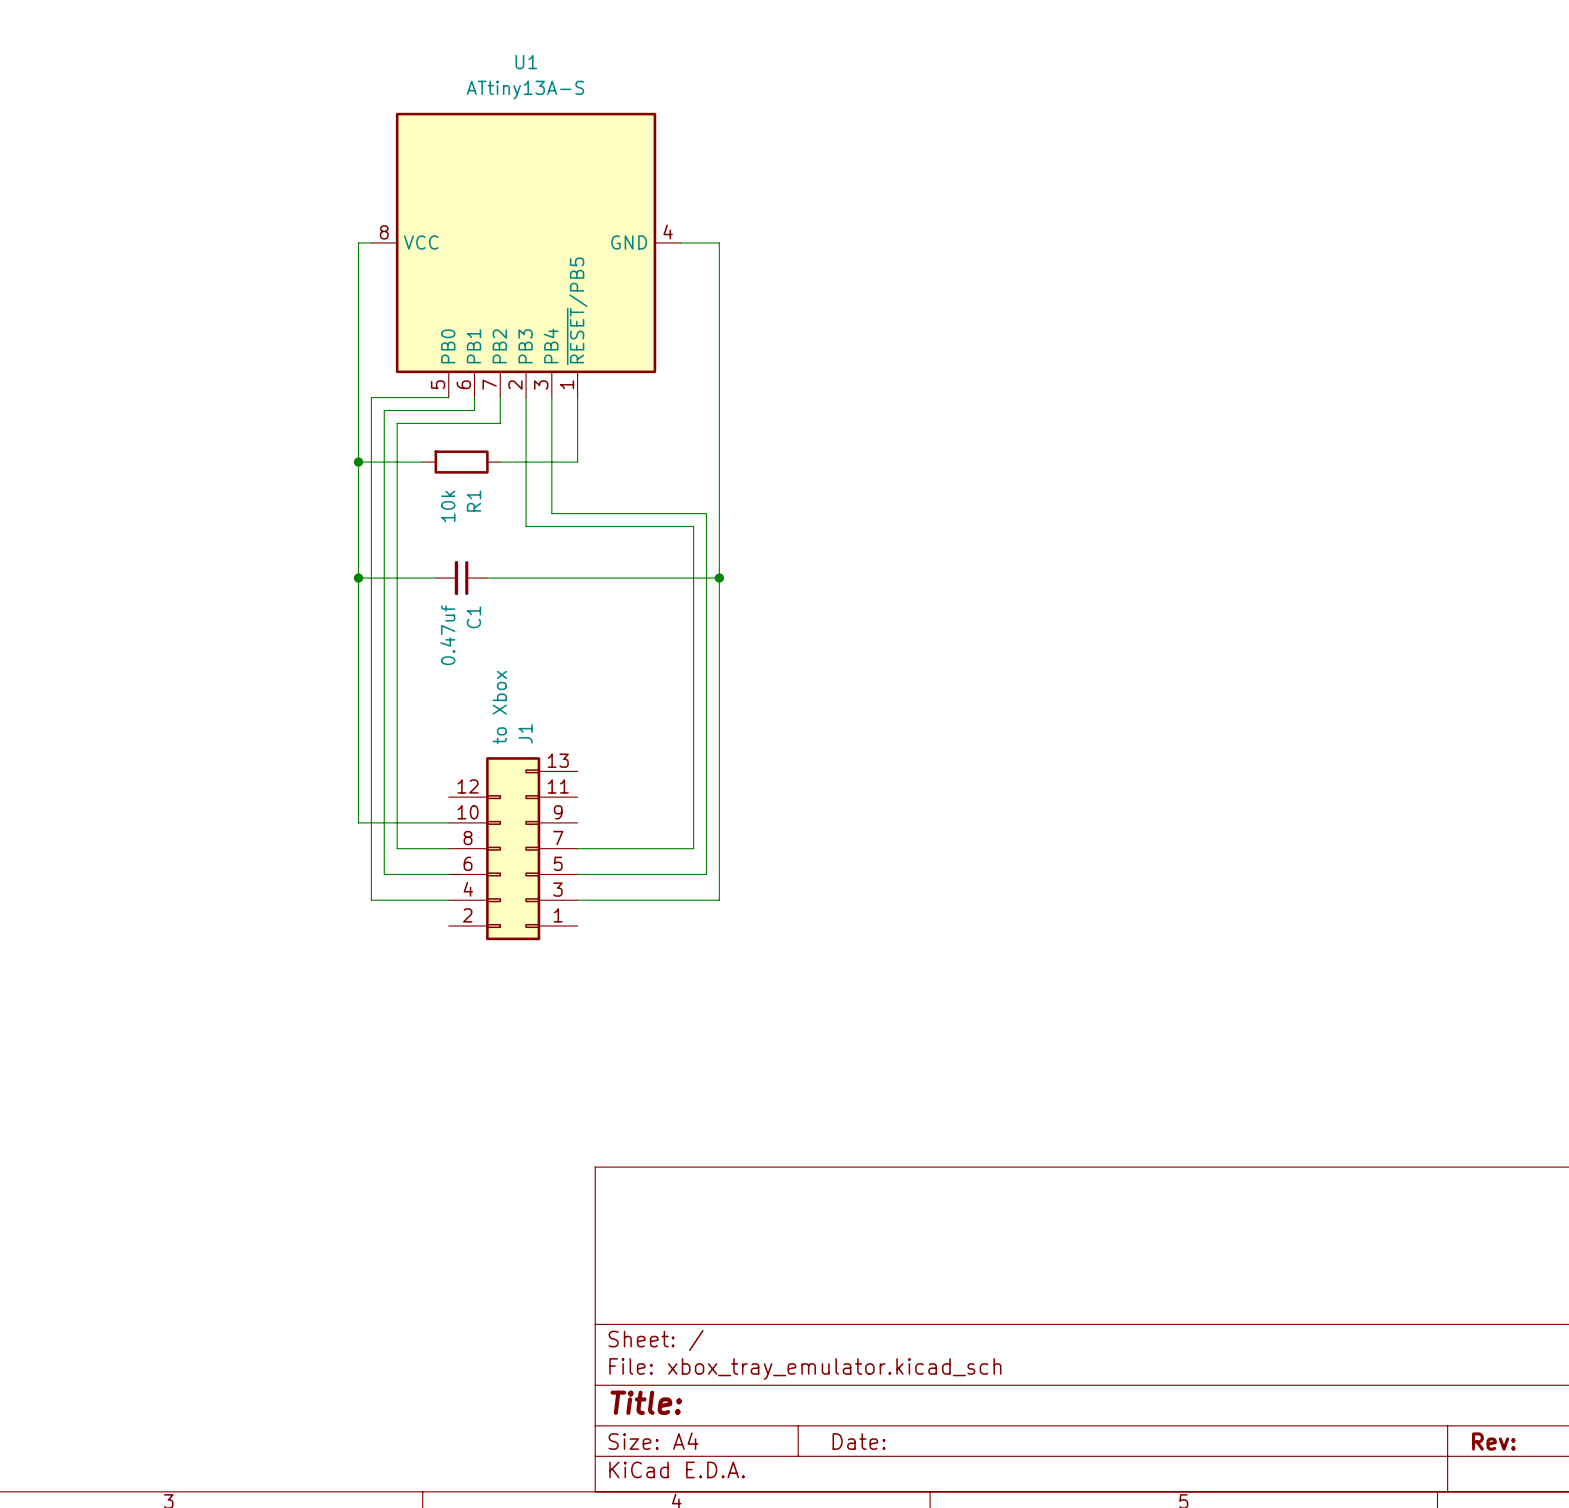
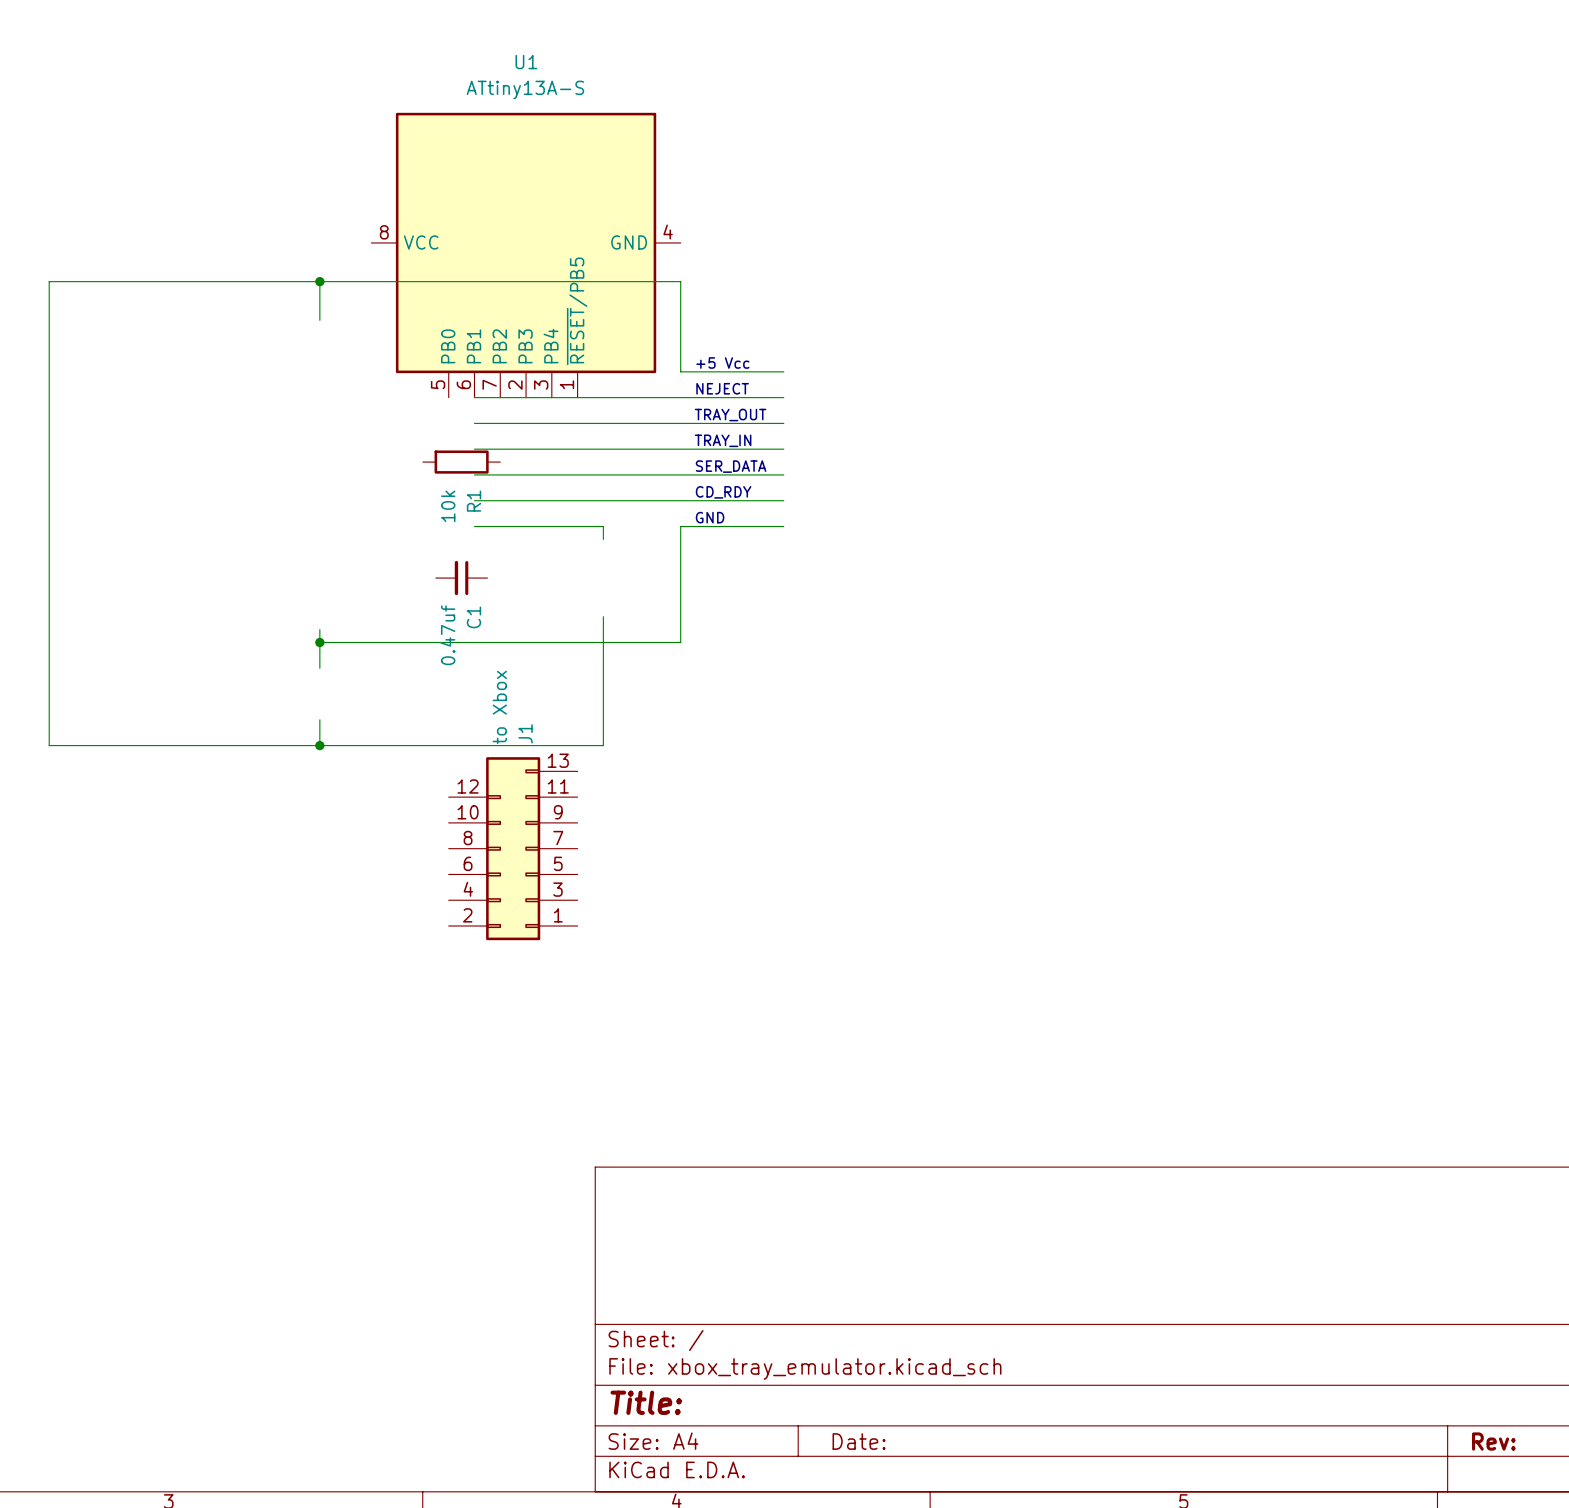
wire: (371, 242) (358, 242) (358, 822) (448, 822) -> none
wire: (680, 242) (719, 242) (719, 900) (577, 900) -> none
wire: none -> (319, 281) (319, 320)
junction: none -> (319, 281)
text: none -> +5 Vcc (722, 363)
wire: none -> (783, 371) (680, 371) (680, 281) (49, 281) (49, 745) (603, 745) (603, 616)
text: none -> NEJECT (722, 388)
wire: (448, 397) (371, 397) (371, 900) (448, 900) -> none
wire: (474, 397) (474, 410) (384, 410) (384, 874) (448, 874) -> (474, 397) (783, 397)
wire: (500, 397) (500, 423) -> (783, 423) (500, 423)
wire: (526, 397) (526, 526) -> (474, 526) (526, 526)
wire: (551, 397) (551, 513) (706, 513) (706, 874) (577, 874) -> none
wire: (577, 397) (577, 462) (500, 462) -> none
text: none -> TRAY_OUT (730, 415)
wire: (474, 423) (397, 423) (397, 848) (448, 848) -> none
text: none -> TRAY_IN (723, 440)
wire: none -> (474, 449) (783, 449)
wire: (358, 462) (422, 462) -> none
junction: (358, 462) -> none
text: none -> SER_DATA (731, 466)
wire: none -> (474, 474) (783, 474)
text: none -> CD_RDY (723, 492)
wire: none -> (474, 500) (783, 500)
text: none -> GND (710, 517)
wire: (603, 526) (680, 526) -> (603, 526) (603, 539)
wire: none -> (680, 526) (680, 642) (319, 642)
wire: (693, 526) (693, 848) (577, 848) -> (693, 526) (783, 526)
wire: (358, 578) (435, 578) -> none
junction: (358, 578) -> none
wire: (487, 578) (719, 578) -> none
junction: (719, 578) -> none
wire: none -> (319, 629) (319, 668)
junction: none -> (319, 642)
wire: none -> (319, 719) (319, 745)
junction: none -> (319, 745)

